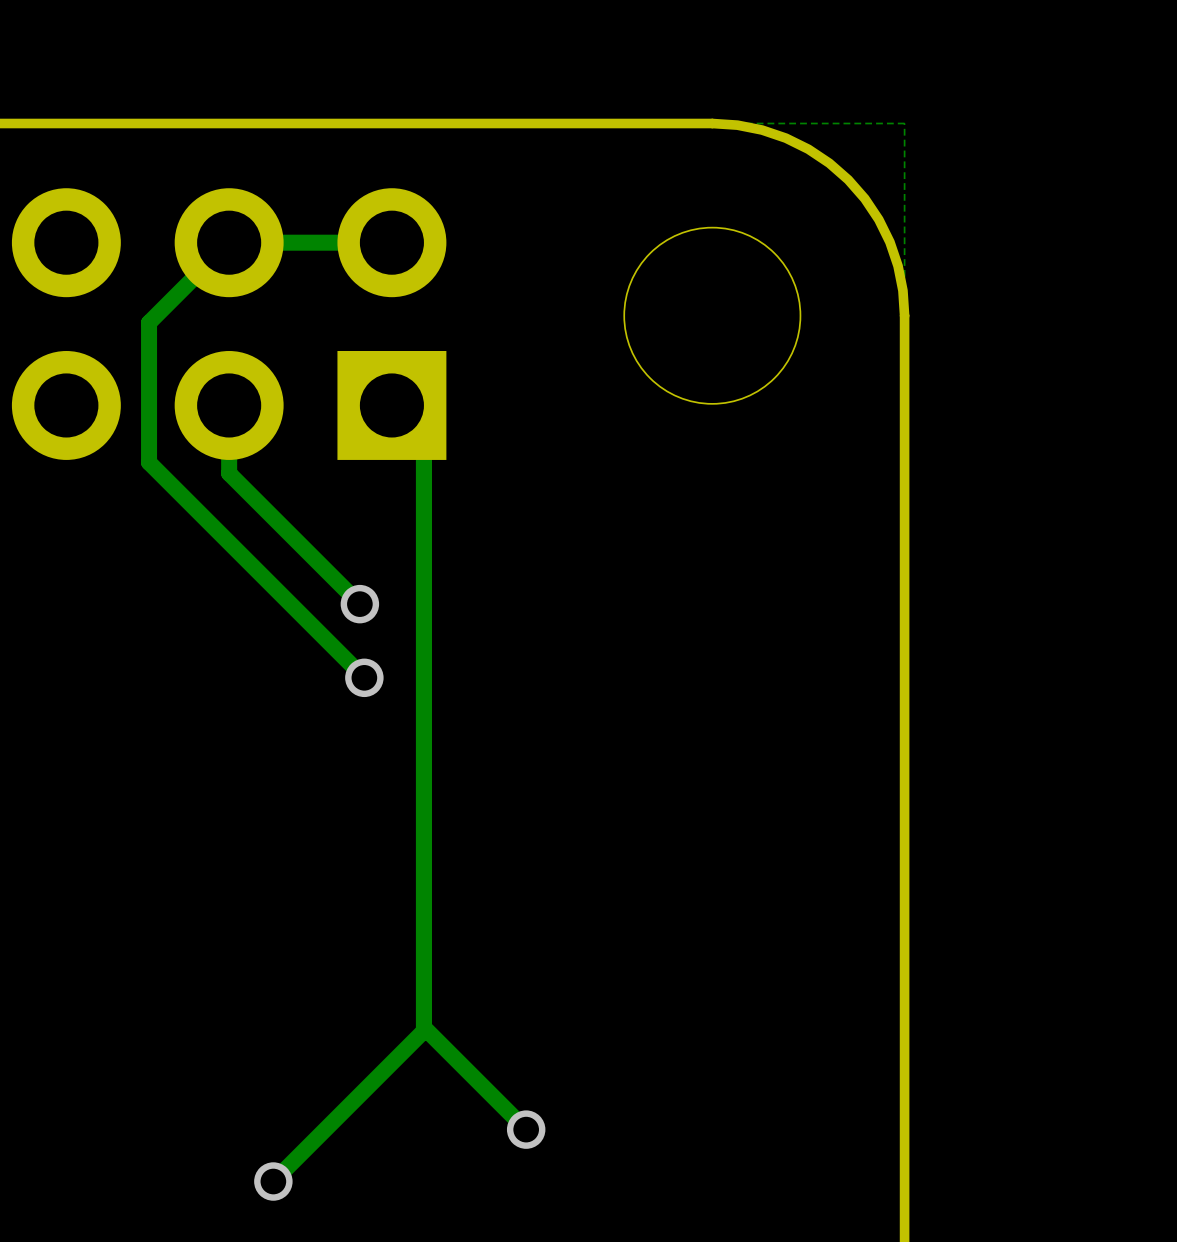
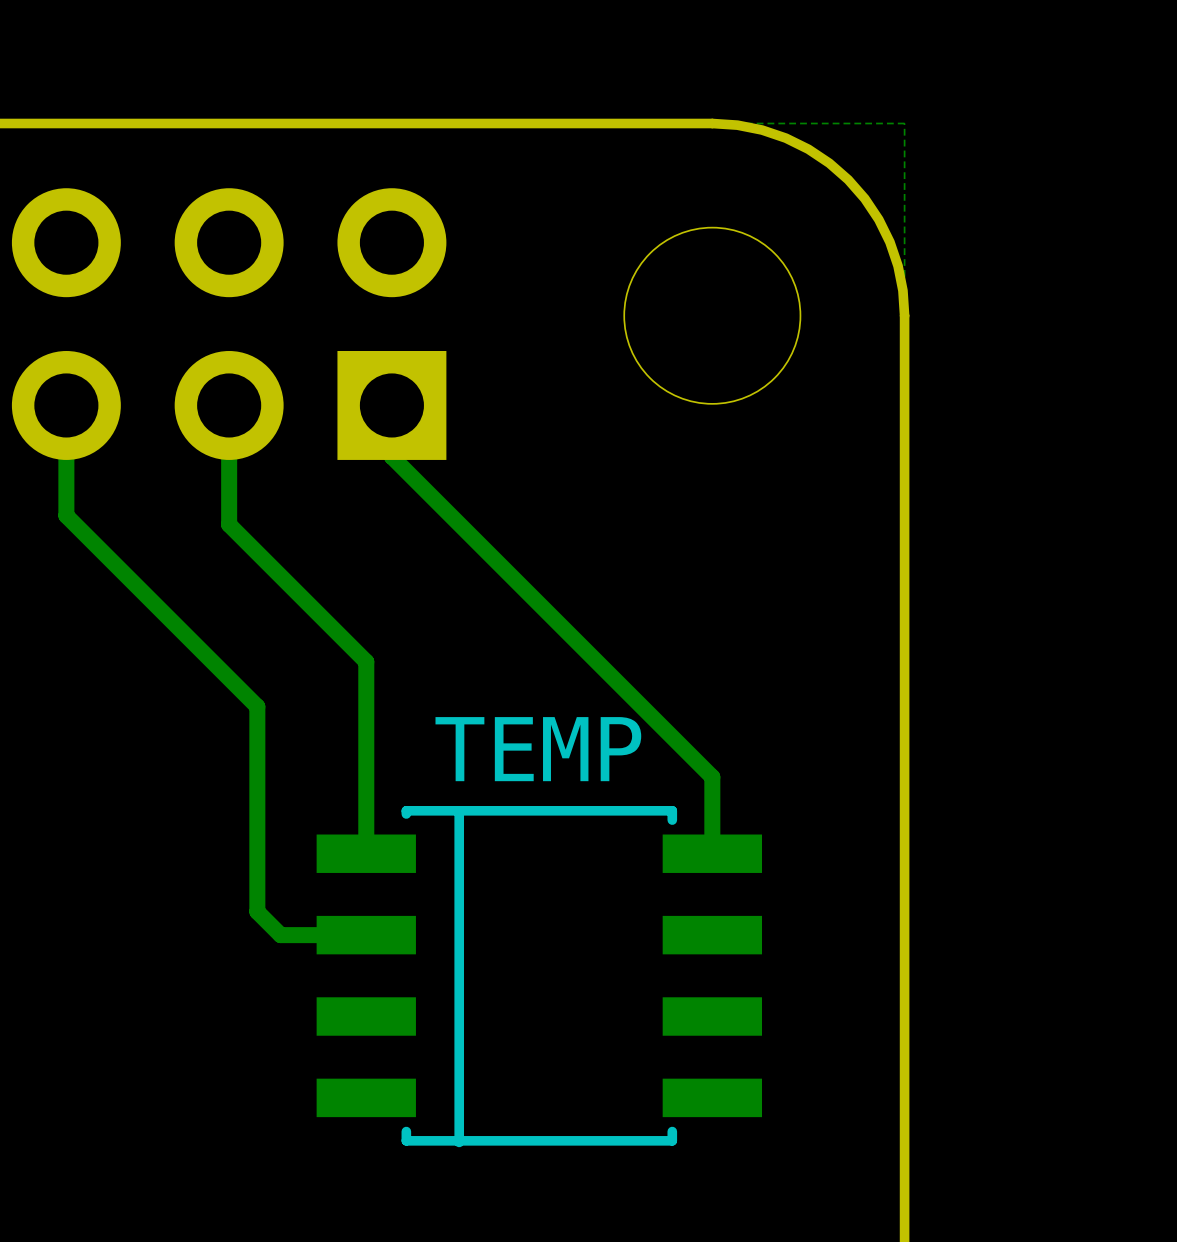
track: (391, 242) (229, 242) (149, 322) (149, 462) (364, 677) -> none
track: (391, 405) (423, 437) (423, 1030) (273, 1181) -> (391, 408) (391, 456) (712, 777) (712, 853)
track: none -> (66, 408) (66, 515) (257, 706) (257, 911) (280, 935) (366, 935)
track: (229, 473) (359, 604) -> (229, 473) (229, 524) (366, 661) (366, 853)
via: (359, 604) -> none
via: (364, 677) -> none
TEMP: none -> (539, 976)
track: (423, 1027) (526, 1129) -> none
via: (526, 1129) -> none
via: (273, 1181) -> none

